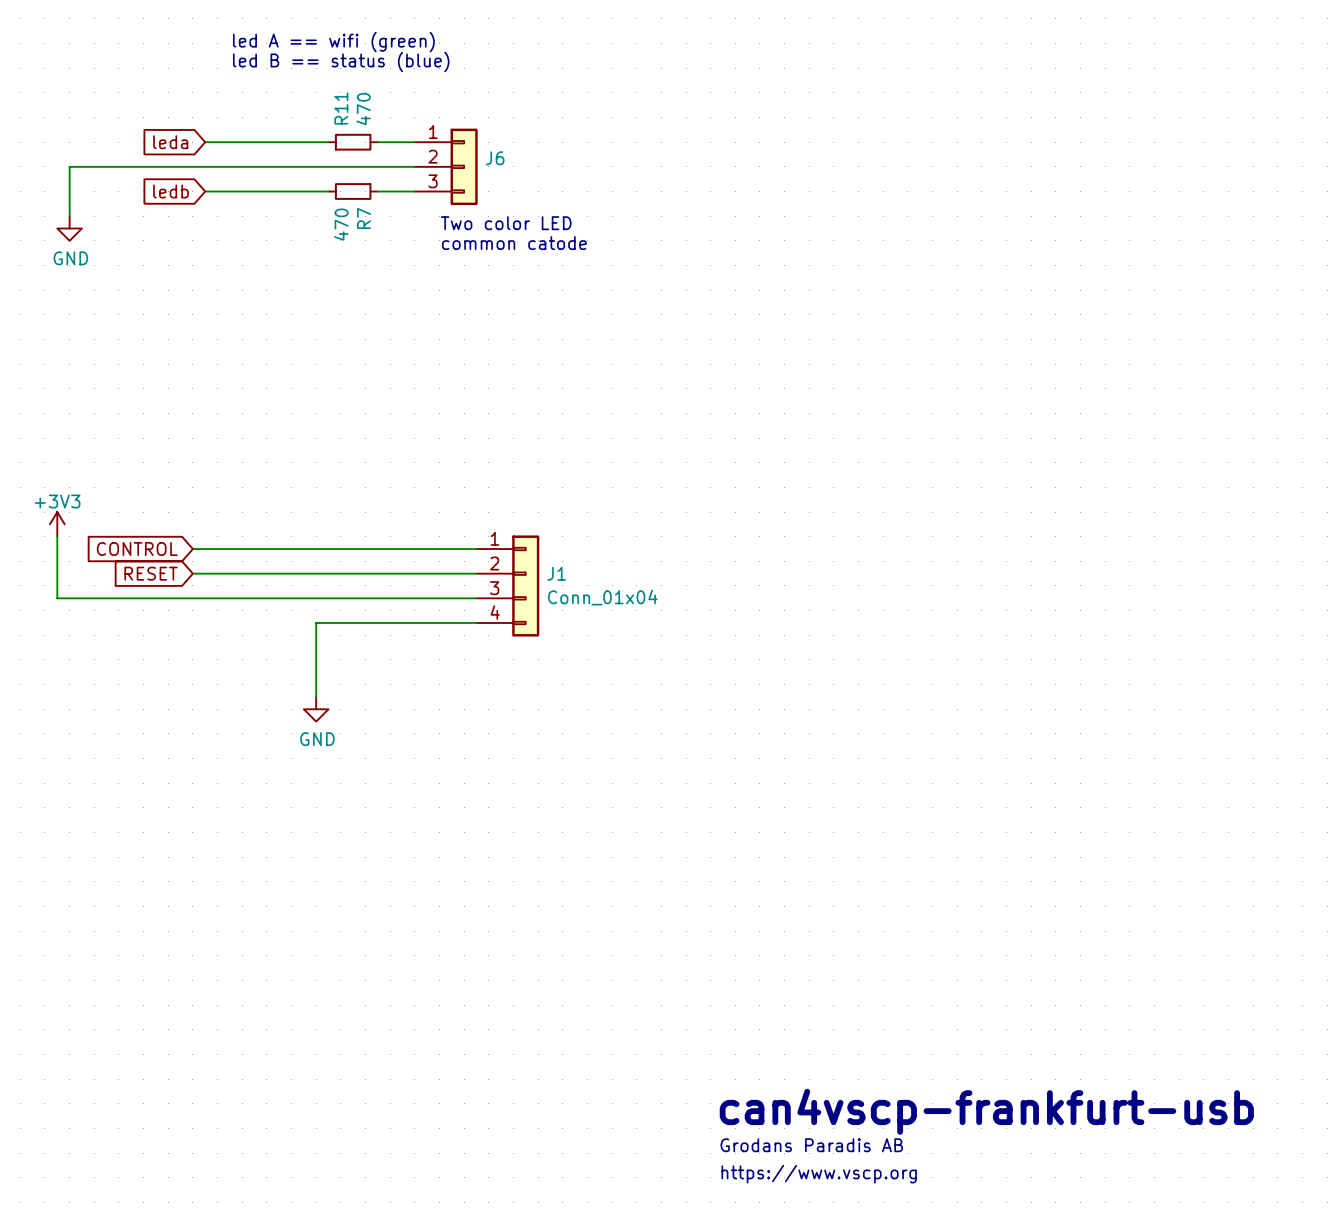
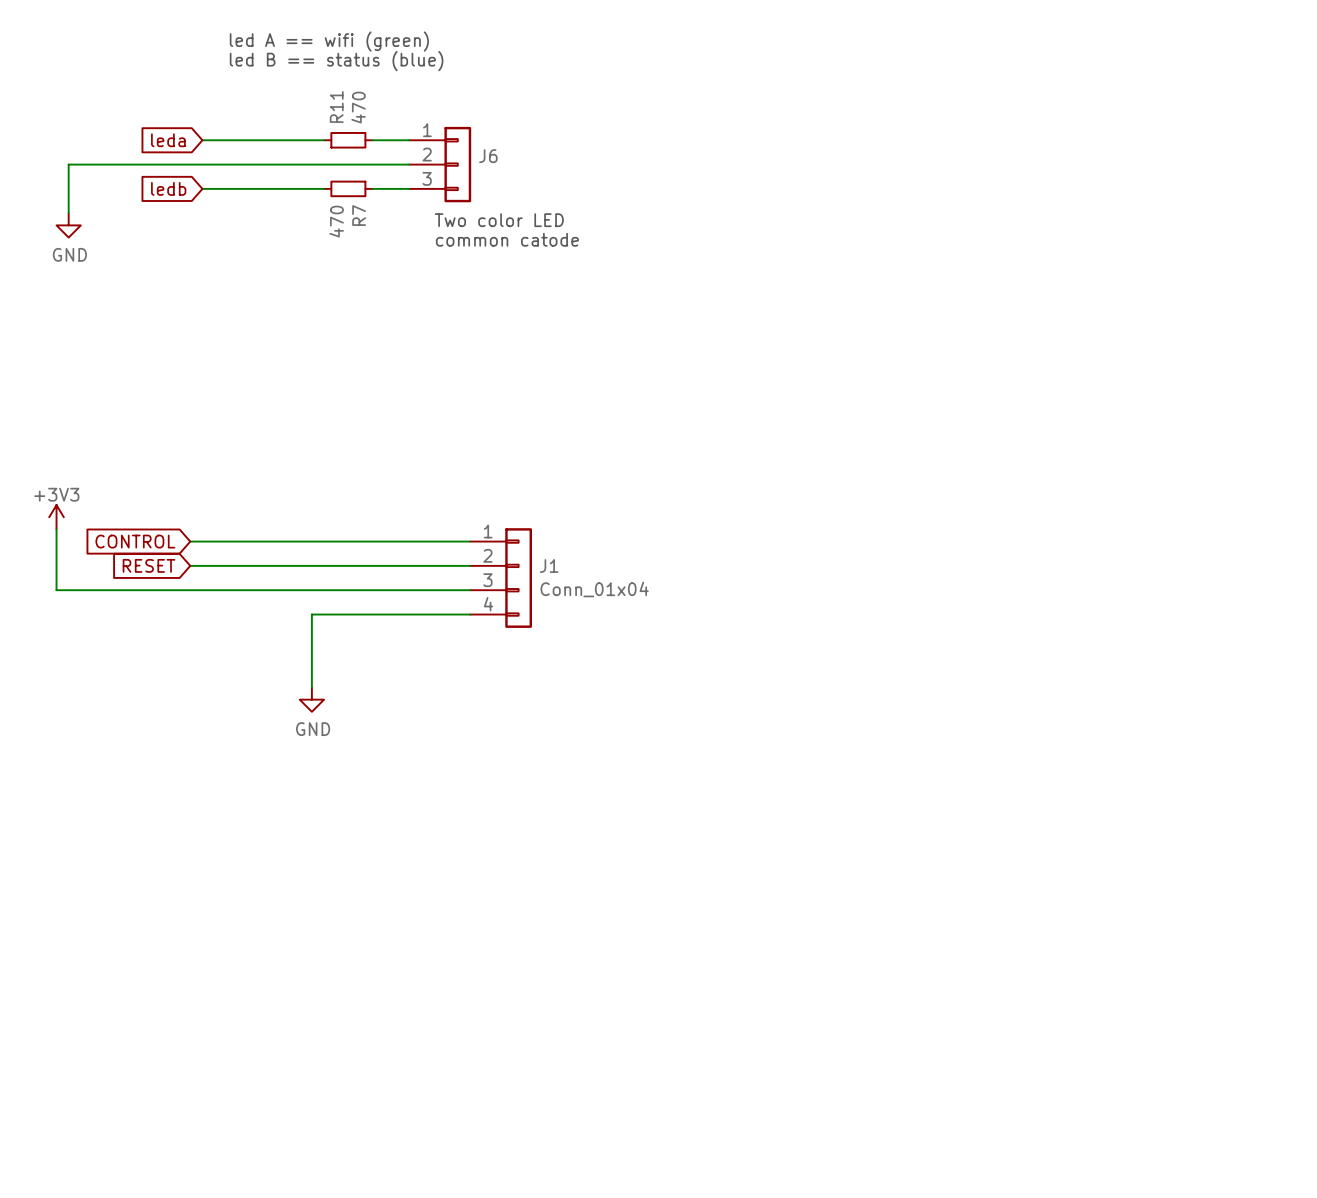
text: can4vscp-frankfurt-usb (986, 1111) -> none
text: Grodans Paradis AB (811, 1145) -> none
text: https://www.vscp.org (819, 1174) -> none

